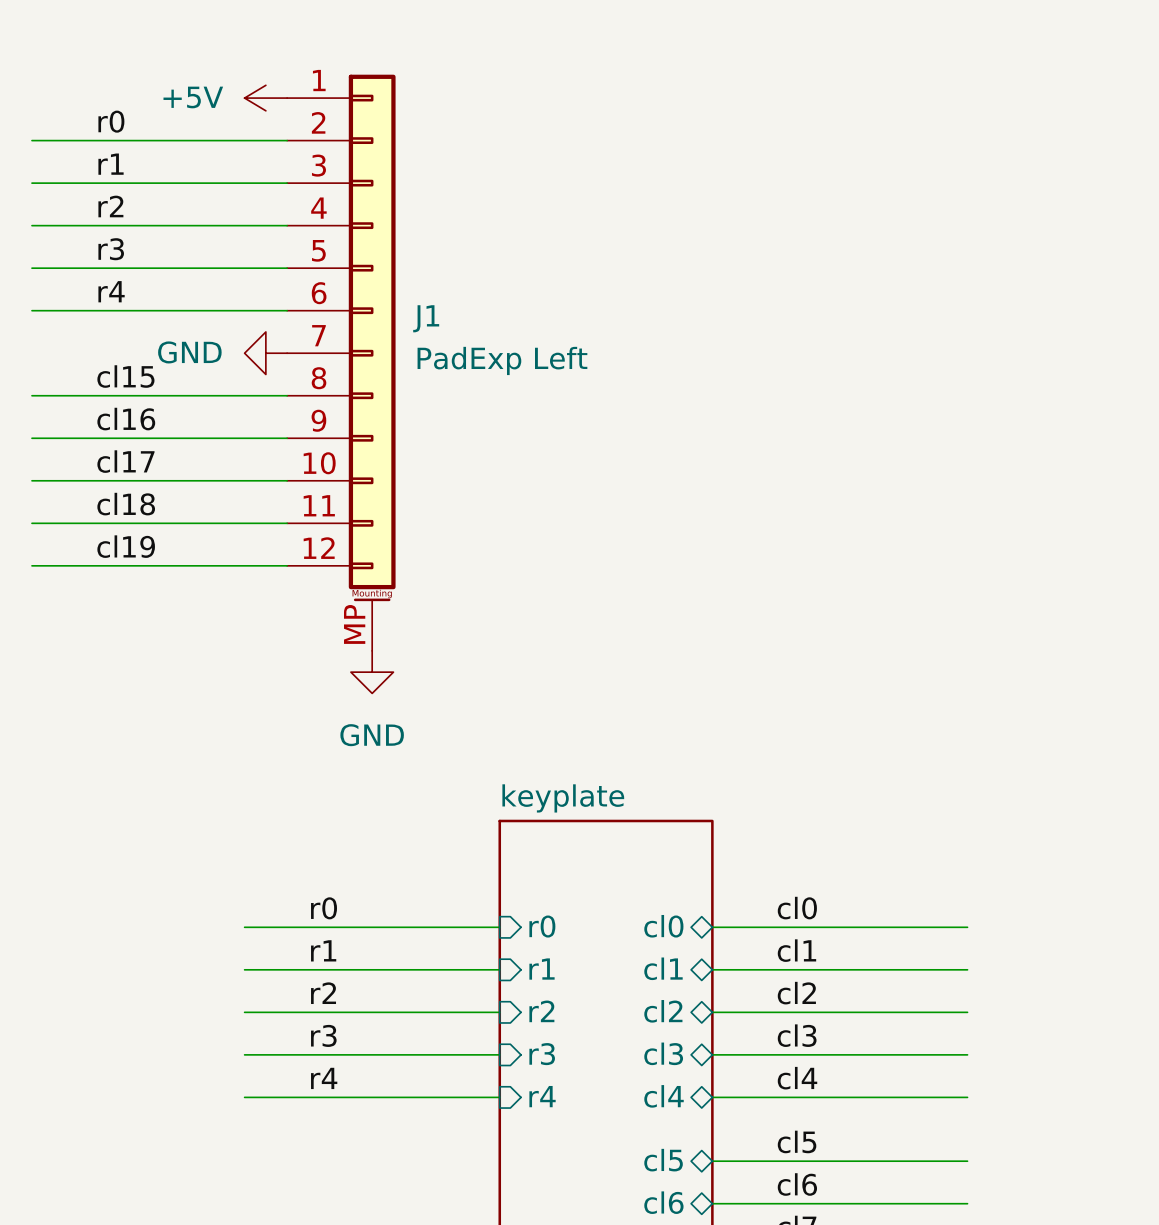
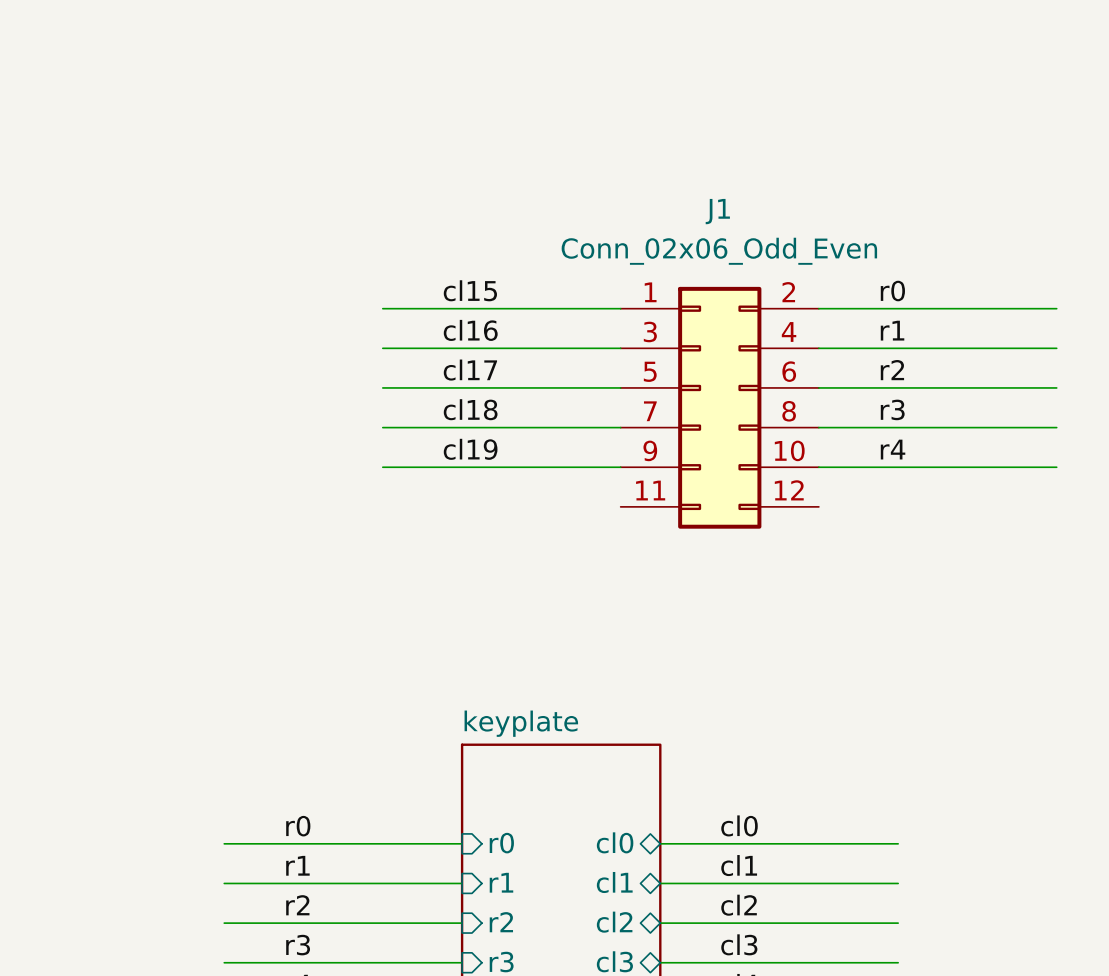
J1 symbol: [287, 74, 396, 651] -> [620, 286, 819, 529]
power symbol: +5V (265, 98) -> none
label: r0 (111, 121) -> none
wire: (31, 140) (287, 140) -> none
label: r1 (111, 164) -> none
wire: (31, 183) (287, 183) -> none
label: r2 (110, 206) -> none
wire: (31, 225) (287, 225) -> none
label: r3 (111, 249) -> none
wire: (31, 268) (287, 268) -> none
label: r4 (111, 291) -> none
wire: (31, 310) (287, 310) -> none
J1 name position: J1 (426, 318) -> J1 (717, 211)
label: none -> r0 (892, 291)
power symbol: GND (265, 353) -> none
wire: none -> (818, 308) (1056, 308)
J1 value: PadExp Left (502, 360) -> Conn_02x06_Odd_Even (719, 251)
label position: cl15 (125, 376) -> cl15 (470, 290)
label: none -> r1 (892, 330)
wire: (31, 395) (287, 395) -> (382, 308) (620, 308)
wire: none -> (818, 348) (1056, 348)
label position: cl16 (126, 419) -> cl16 (470, 330)
label: none -> r2 (892, 370)
wire: (31, 438) (287, 438) -> (382, 348) (620, 348)
wire: none -> (818, 387) (1056, 387)
label position: cl17 (125, 461) -> cl17 (470, 370)
label: none -> r3 (892, 409)
wire: (31, 480) (287, 480) -> (382, 387) (620, 387)
wire: none -> (818, 427) (1056, 427)
label position: cl18 (126, 504) -> cl18 (470, 409)
label: none -> r4 (893, 449)
wire: (31, 523) (287, 523) -> (382, 427) (620, 427)
wire: none -> (818, 467) (1056, 467)
label position: cl19 (126, 546) -> cl19 (470, 449)
wire: (31, 565) (287, 565) -> (382, 467) (620, 467)
power symbol: GND (372, 672) -> none

